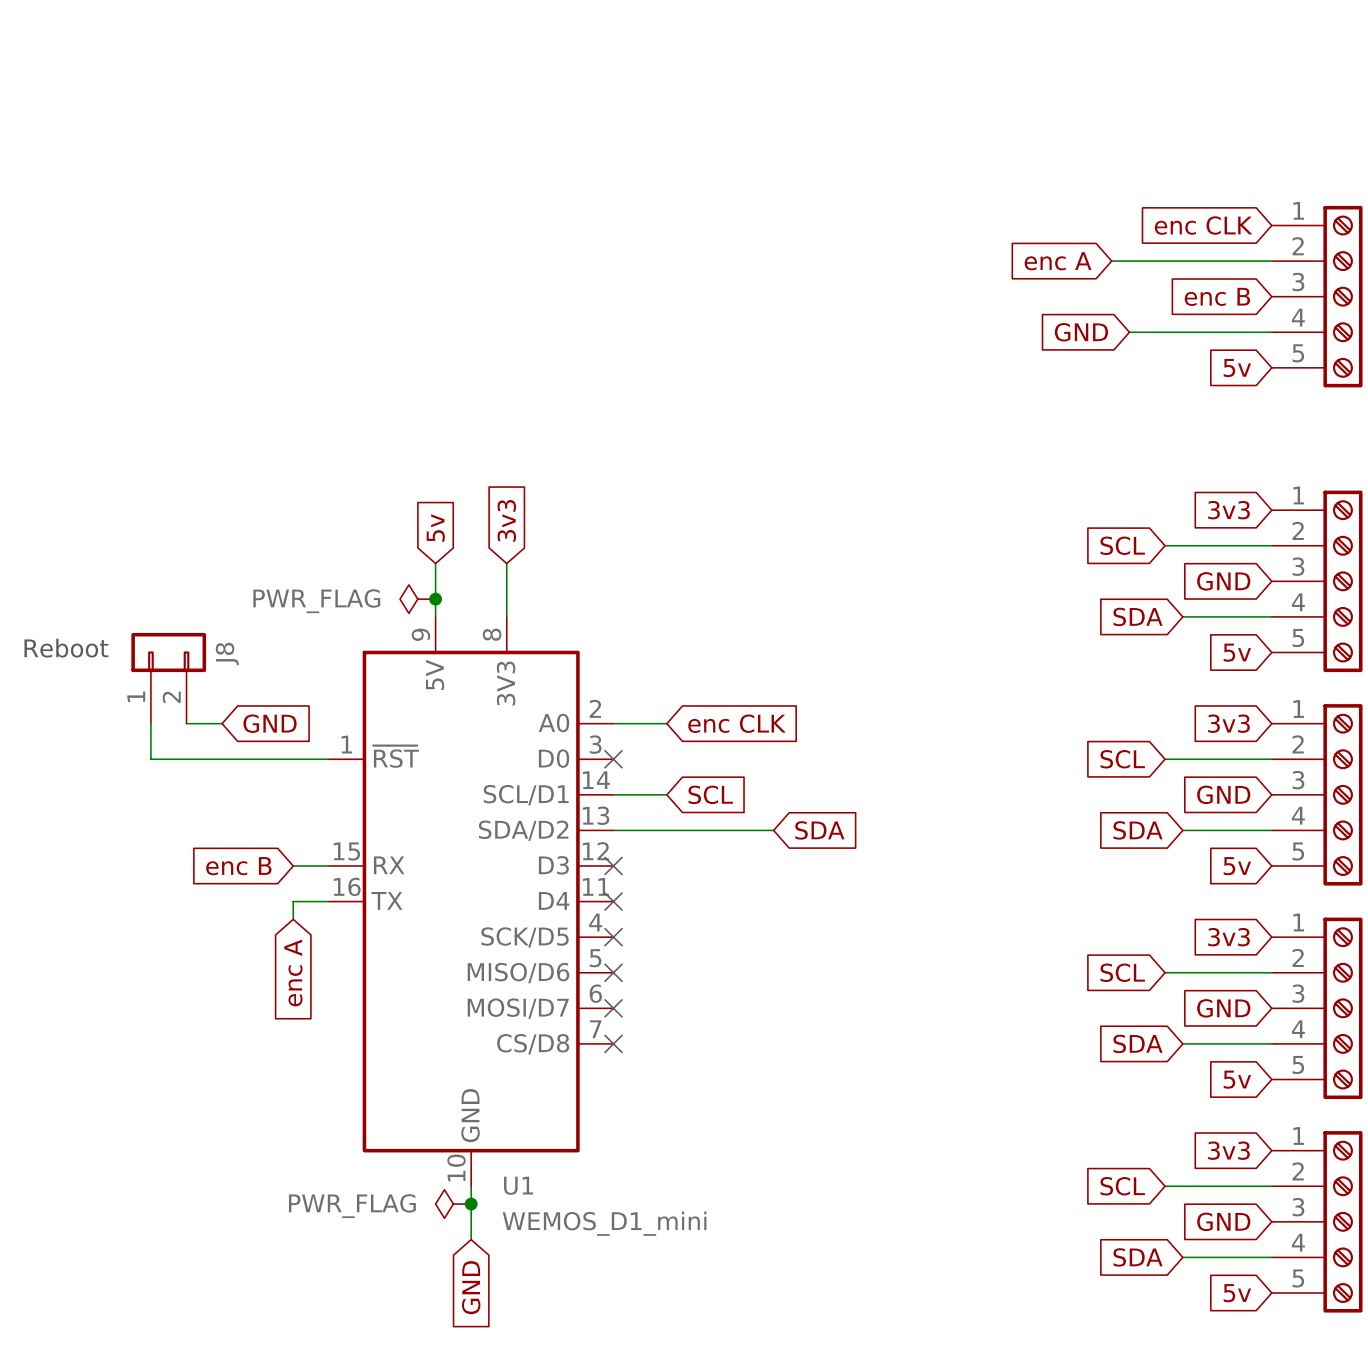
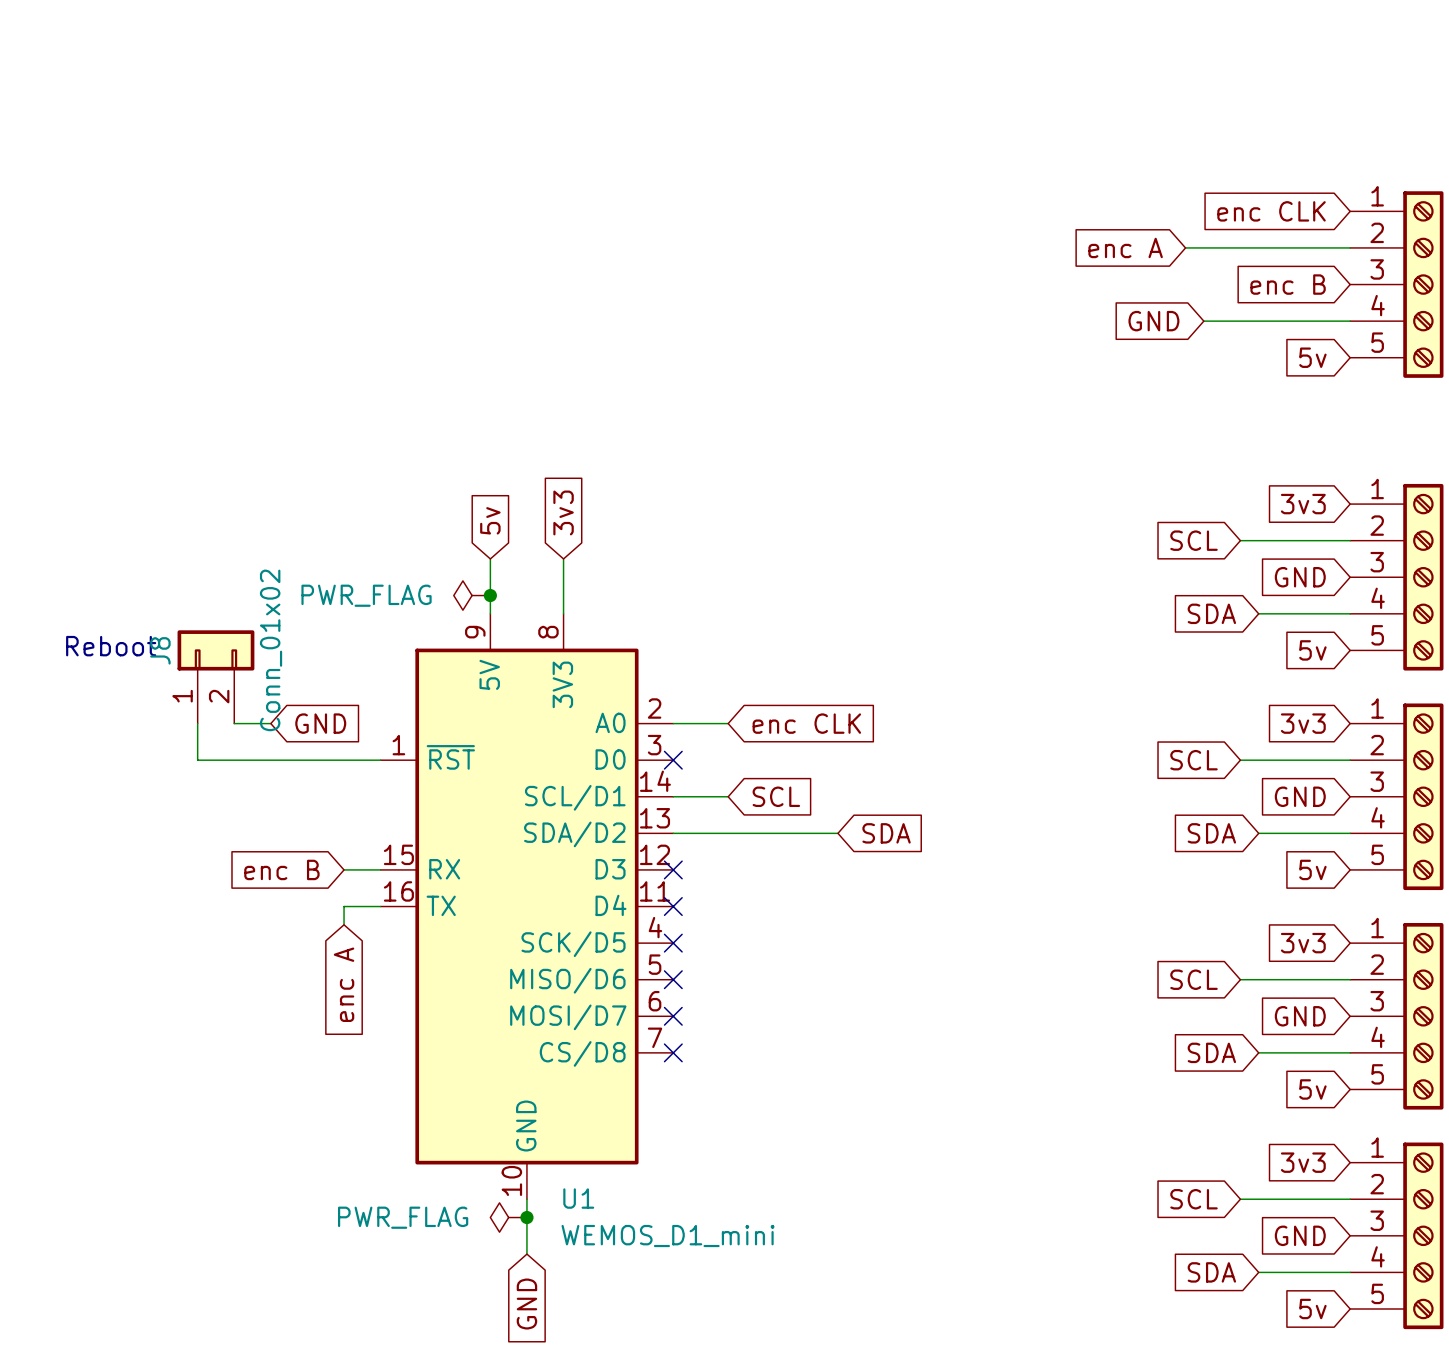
J8 value: none -> Conn_01x02 (271, 650)
J8 name position: J8 (227, 653) -> J8 (160, 650)

